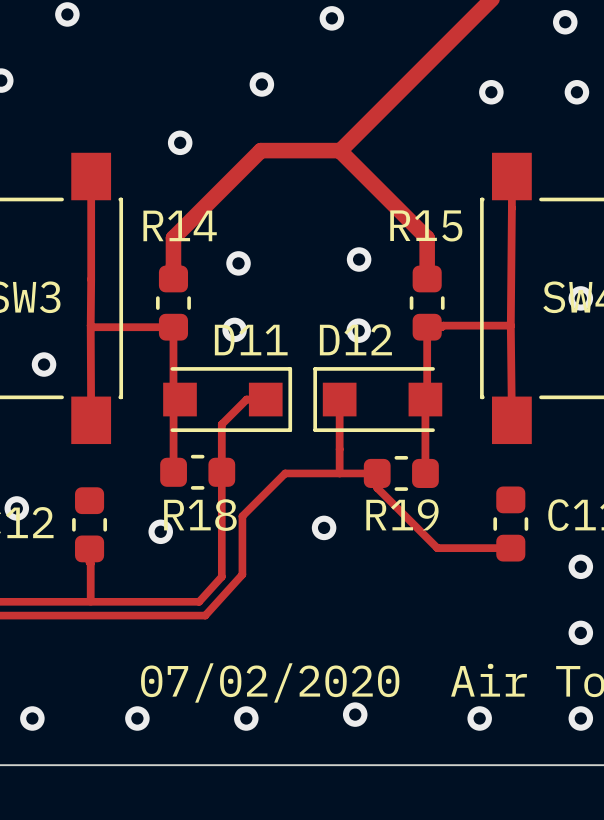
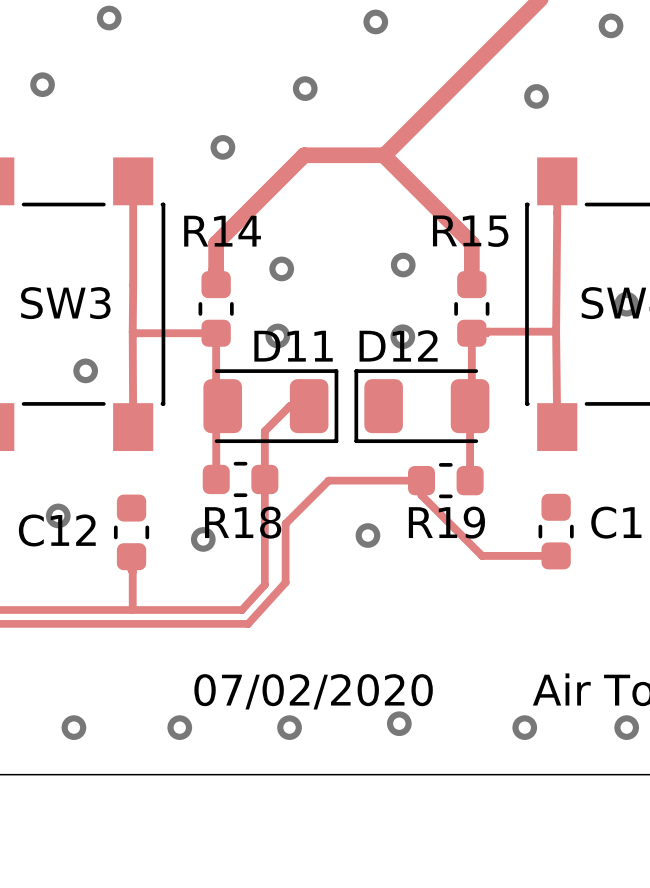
via: (576, 92) -> none
D11 footprint: [163, 367, 293, 433] -> [203, 369, 339, 444]
D12 footprint: [313, 367, 443, 433] -> [354, 369, 490, 444]
track: (339, 399) (339, 473) -> none
via: (580, 566) -> none
via: (580, 632) -> none

